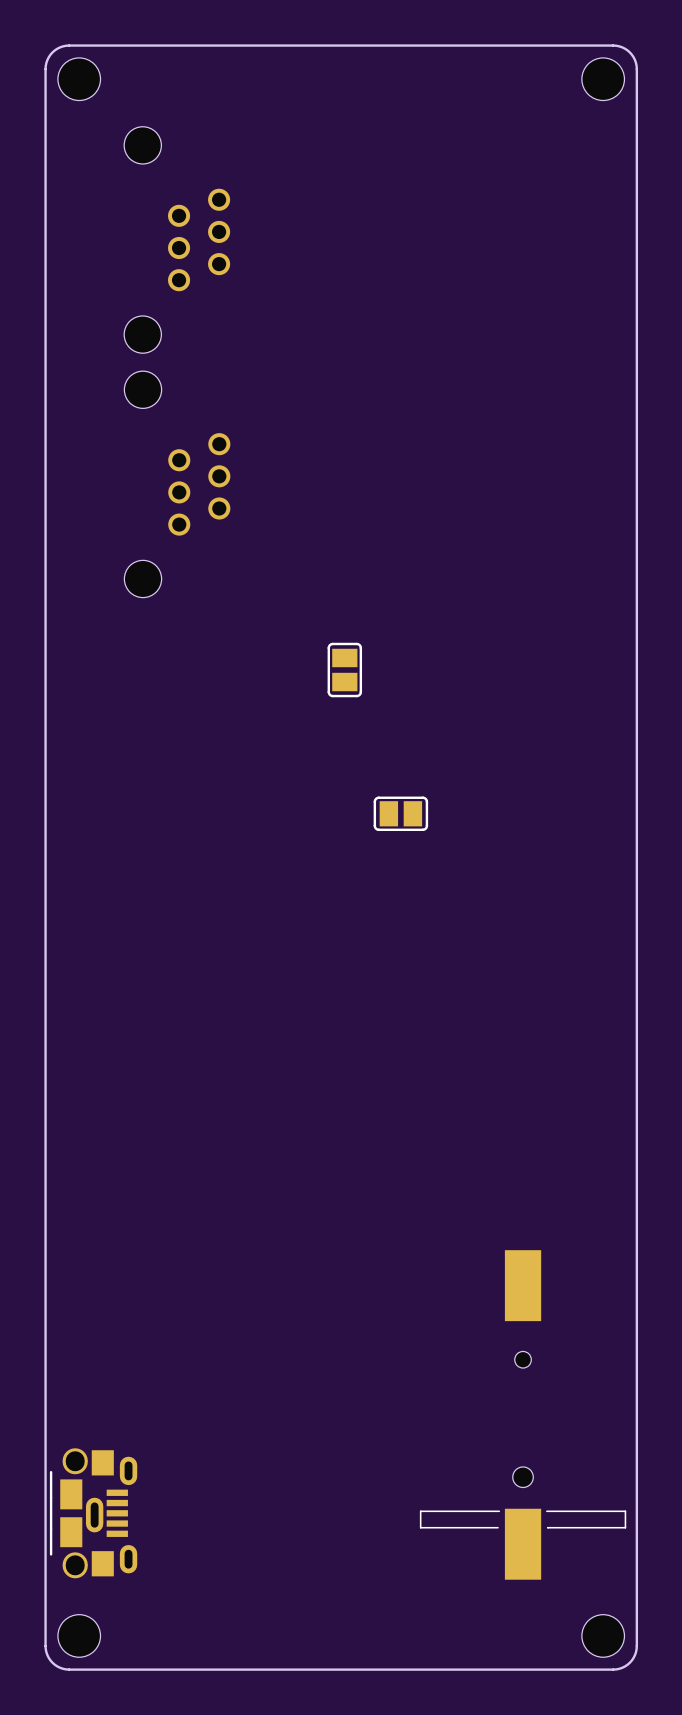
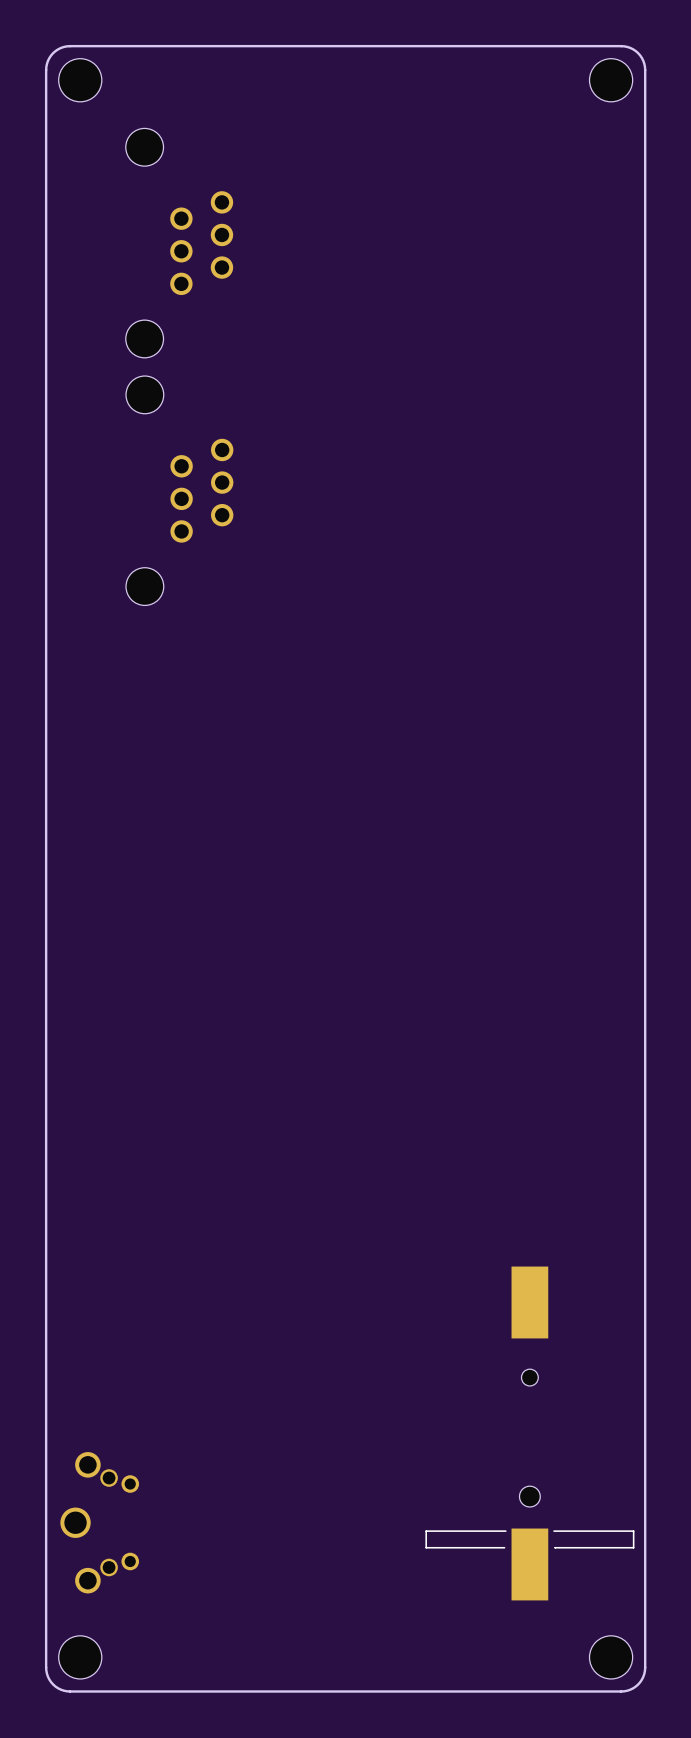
part: (344, 670) -> none
part: (400, 813) -> none
part: none -> (99, 1522)
part: (88, 1513) -> none
part: (111, 1515) -> none

